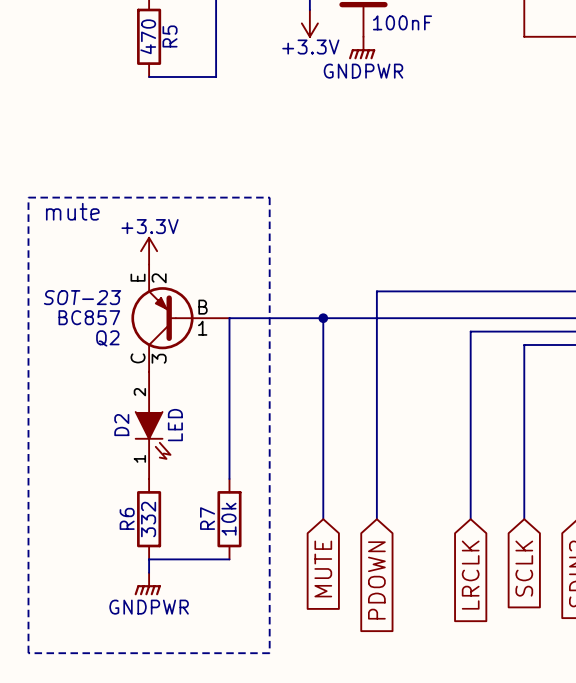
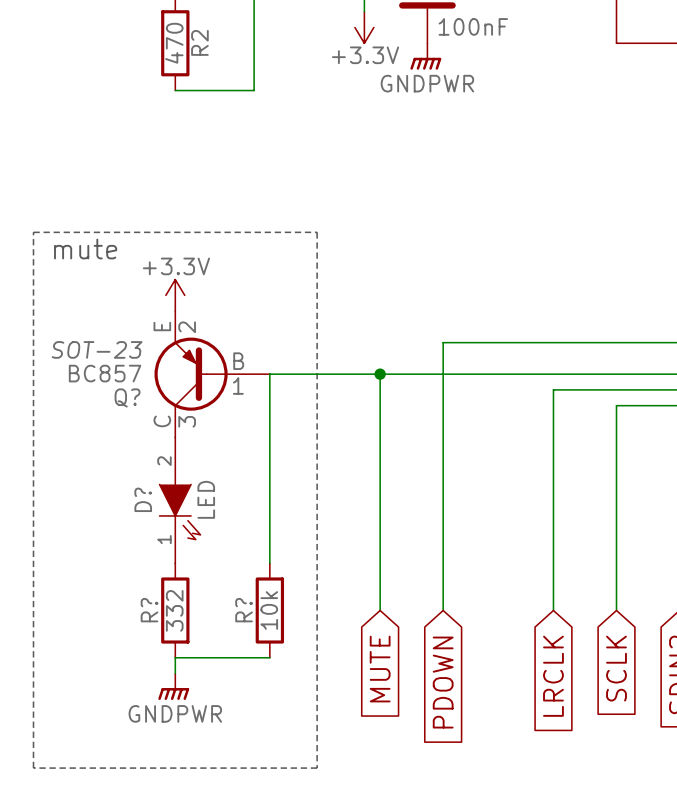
R5 name: R5 (170, 36) -> R2 (199, 42)
Q2 name: Q2 (107, 338) -> Q? (127, 397)
D2 name: D2 (121, 425) -> D? (143, 499)
R6 name: R6 (127, 518) -> R? (149, 610)
R7 name: R7 (207, 518) -> R? (244, 610)

